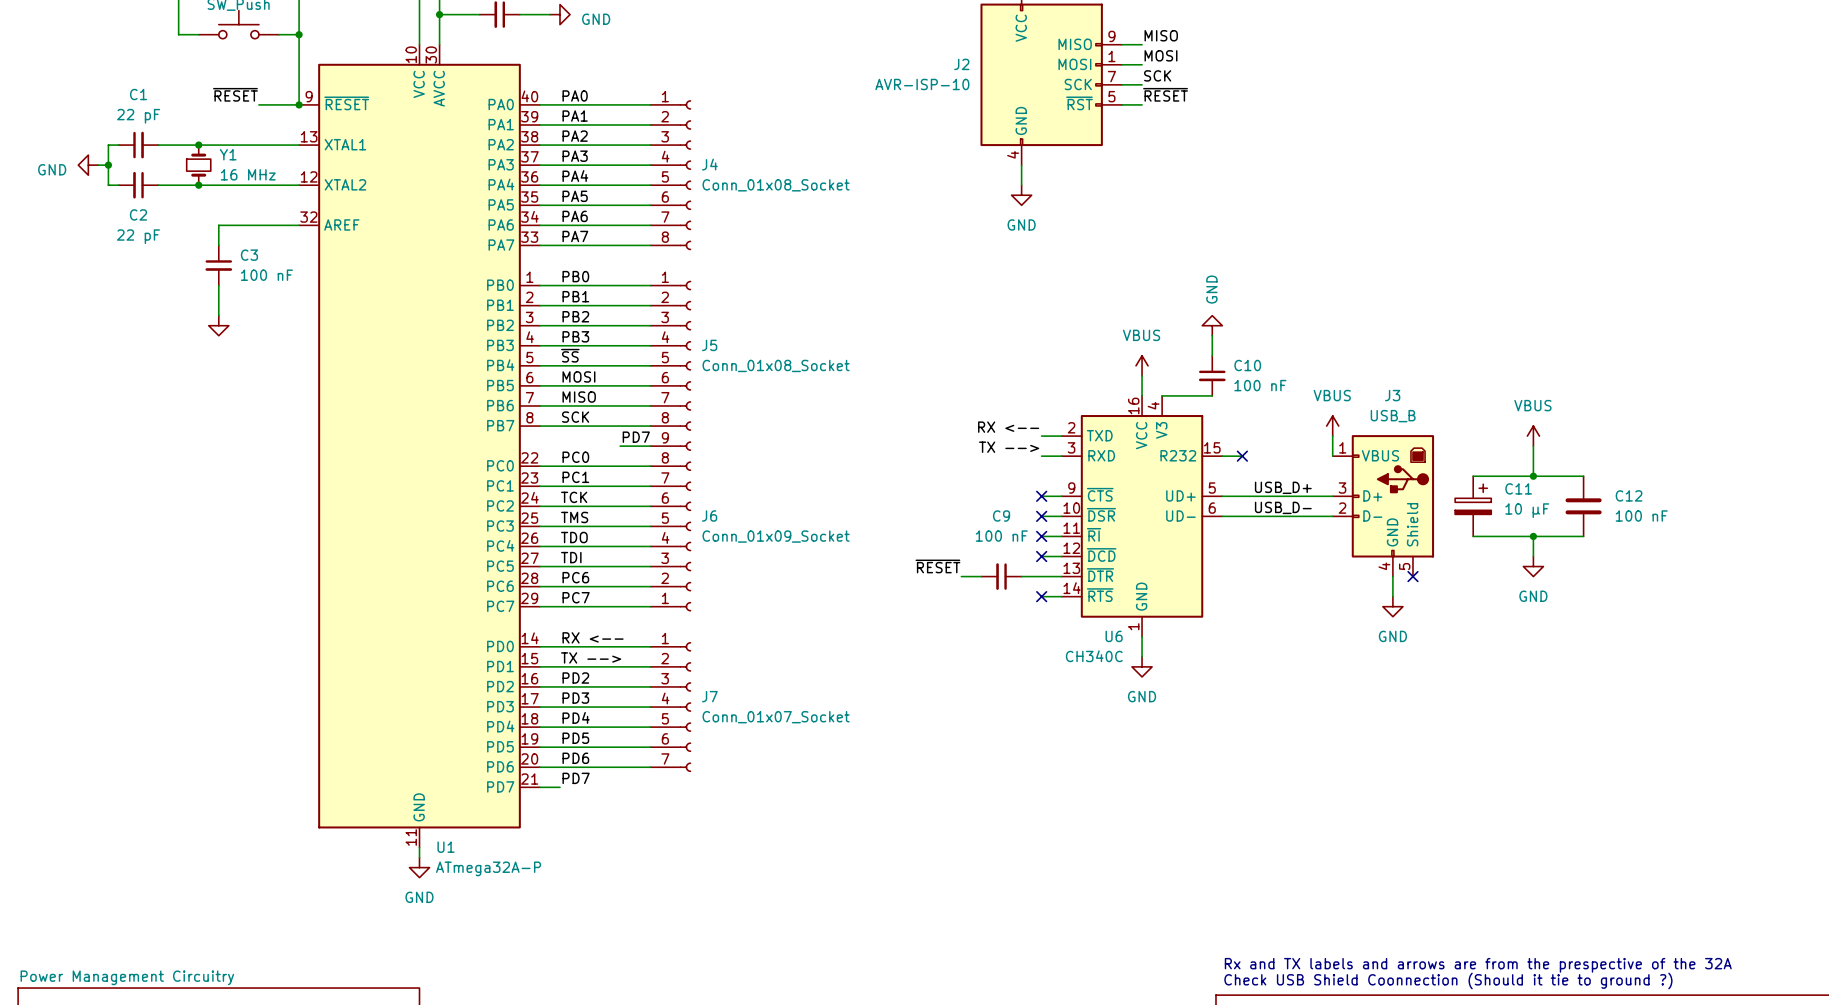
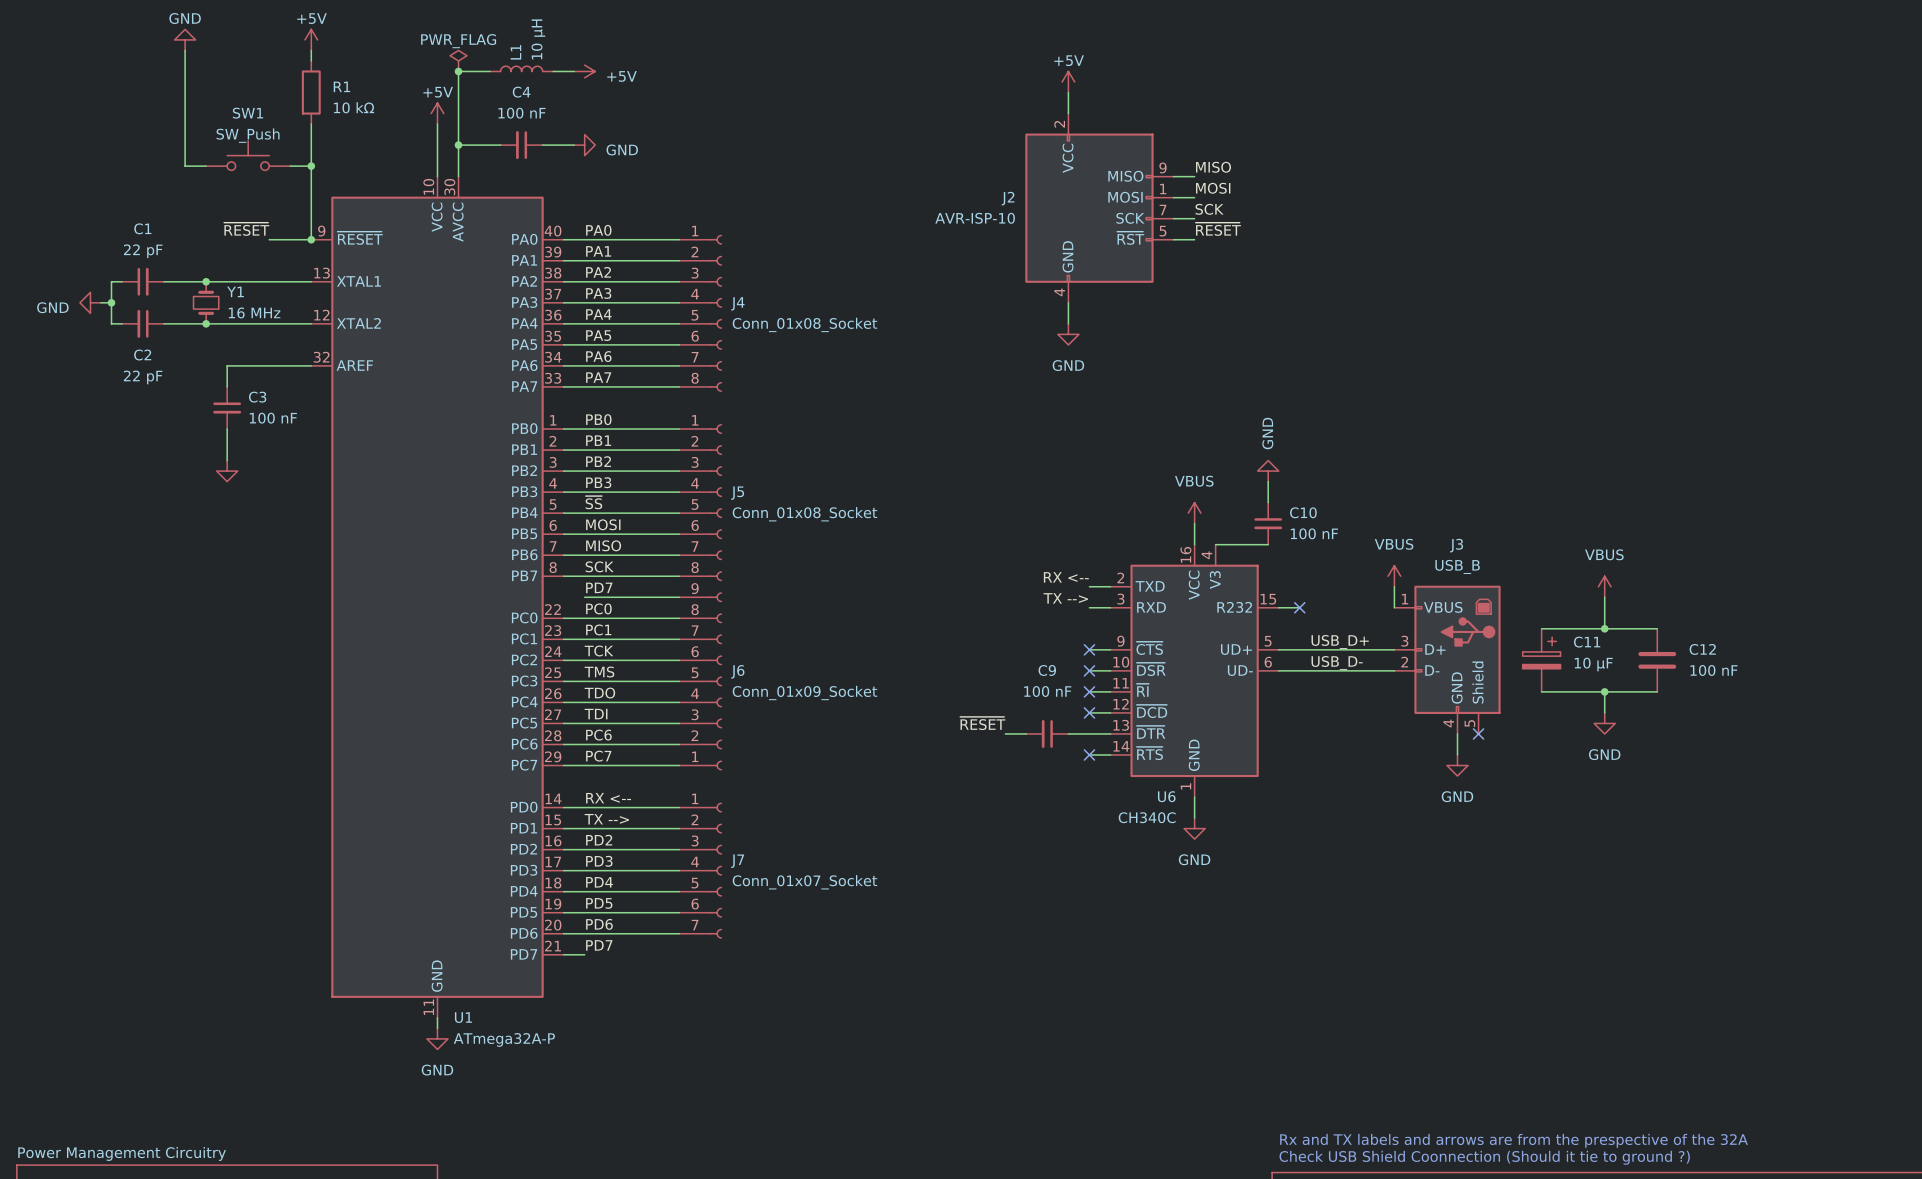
label position: PD7 (636, 437) -> PD7 (599, 587)
wire: none -> (584, 597) (647, 597)

